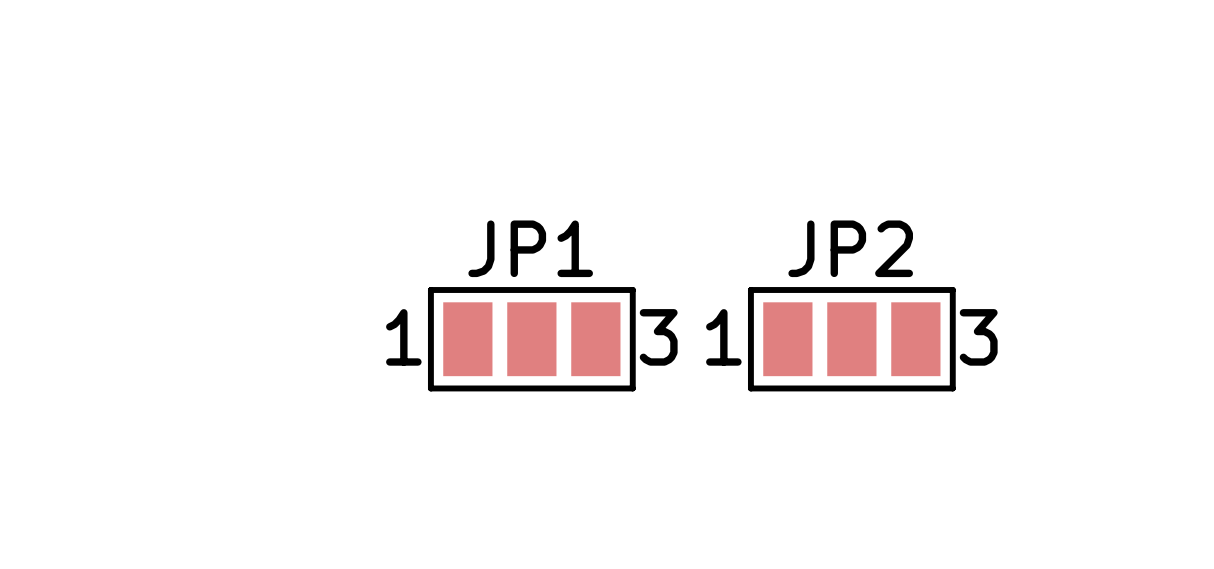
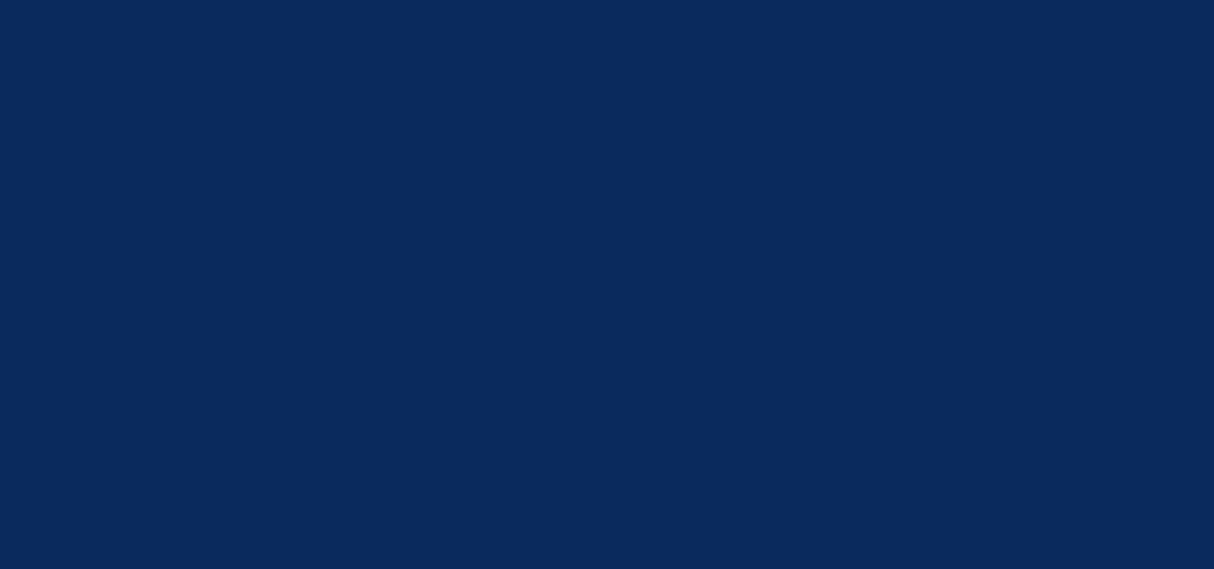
JP1: (531, 339) -> none
JP2: (851, 339) -> none

